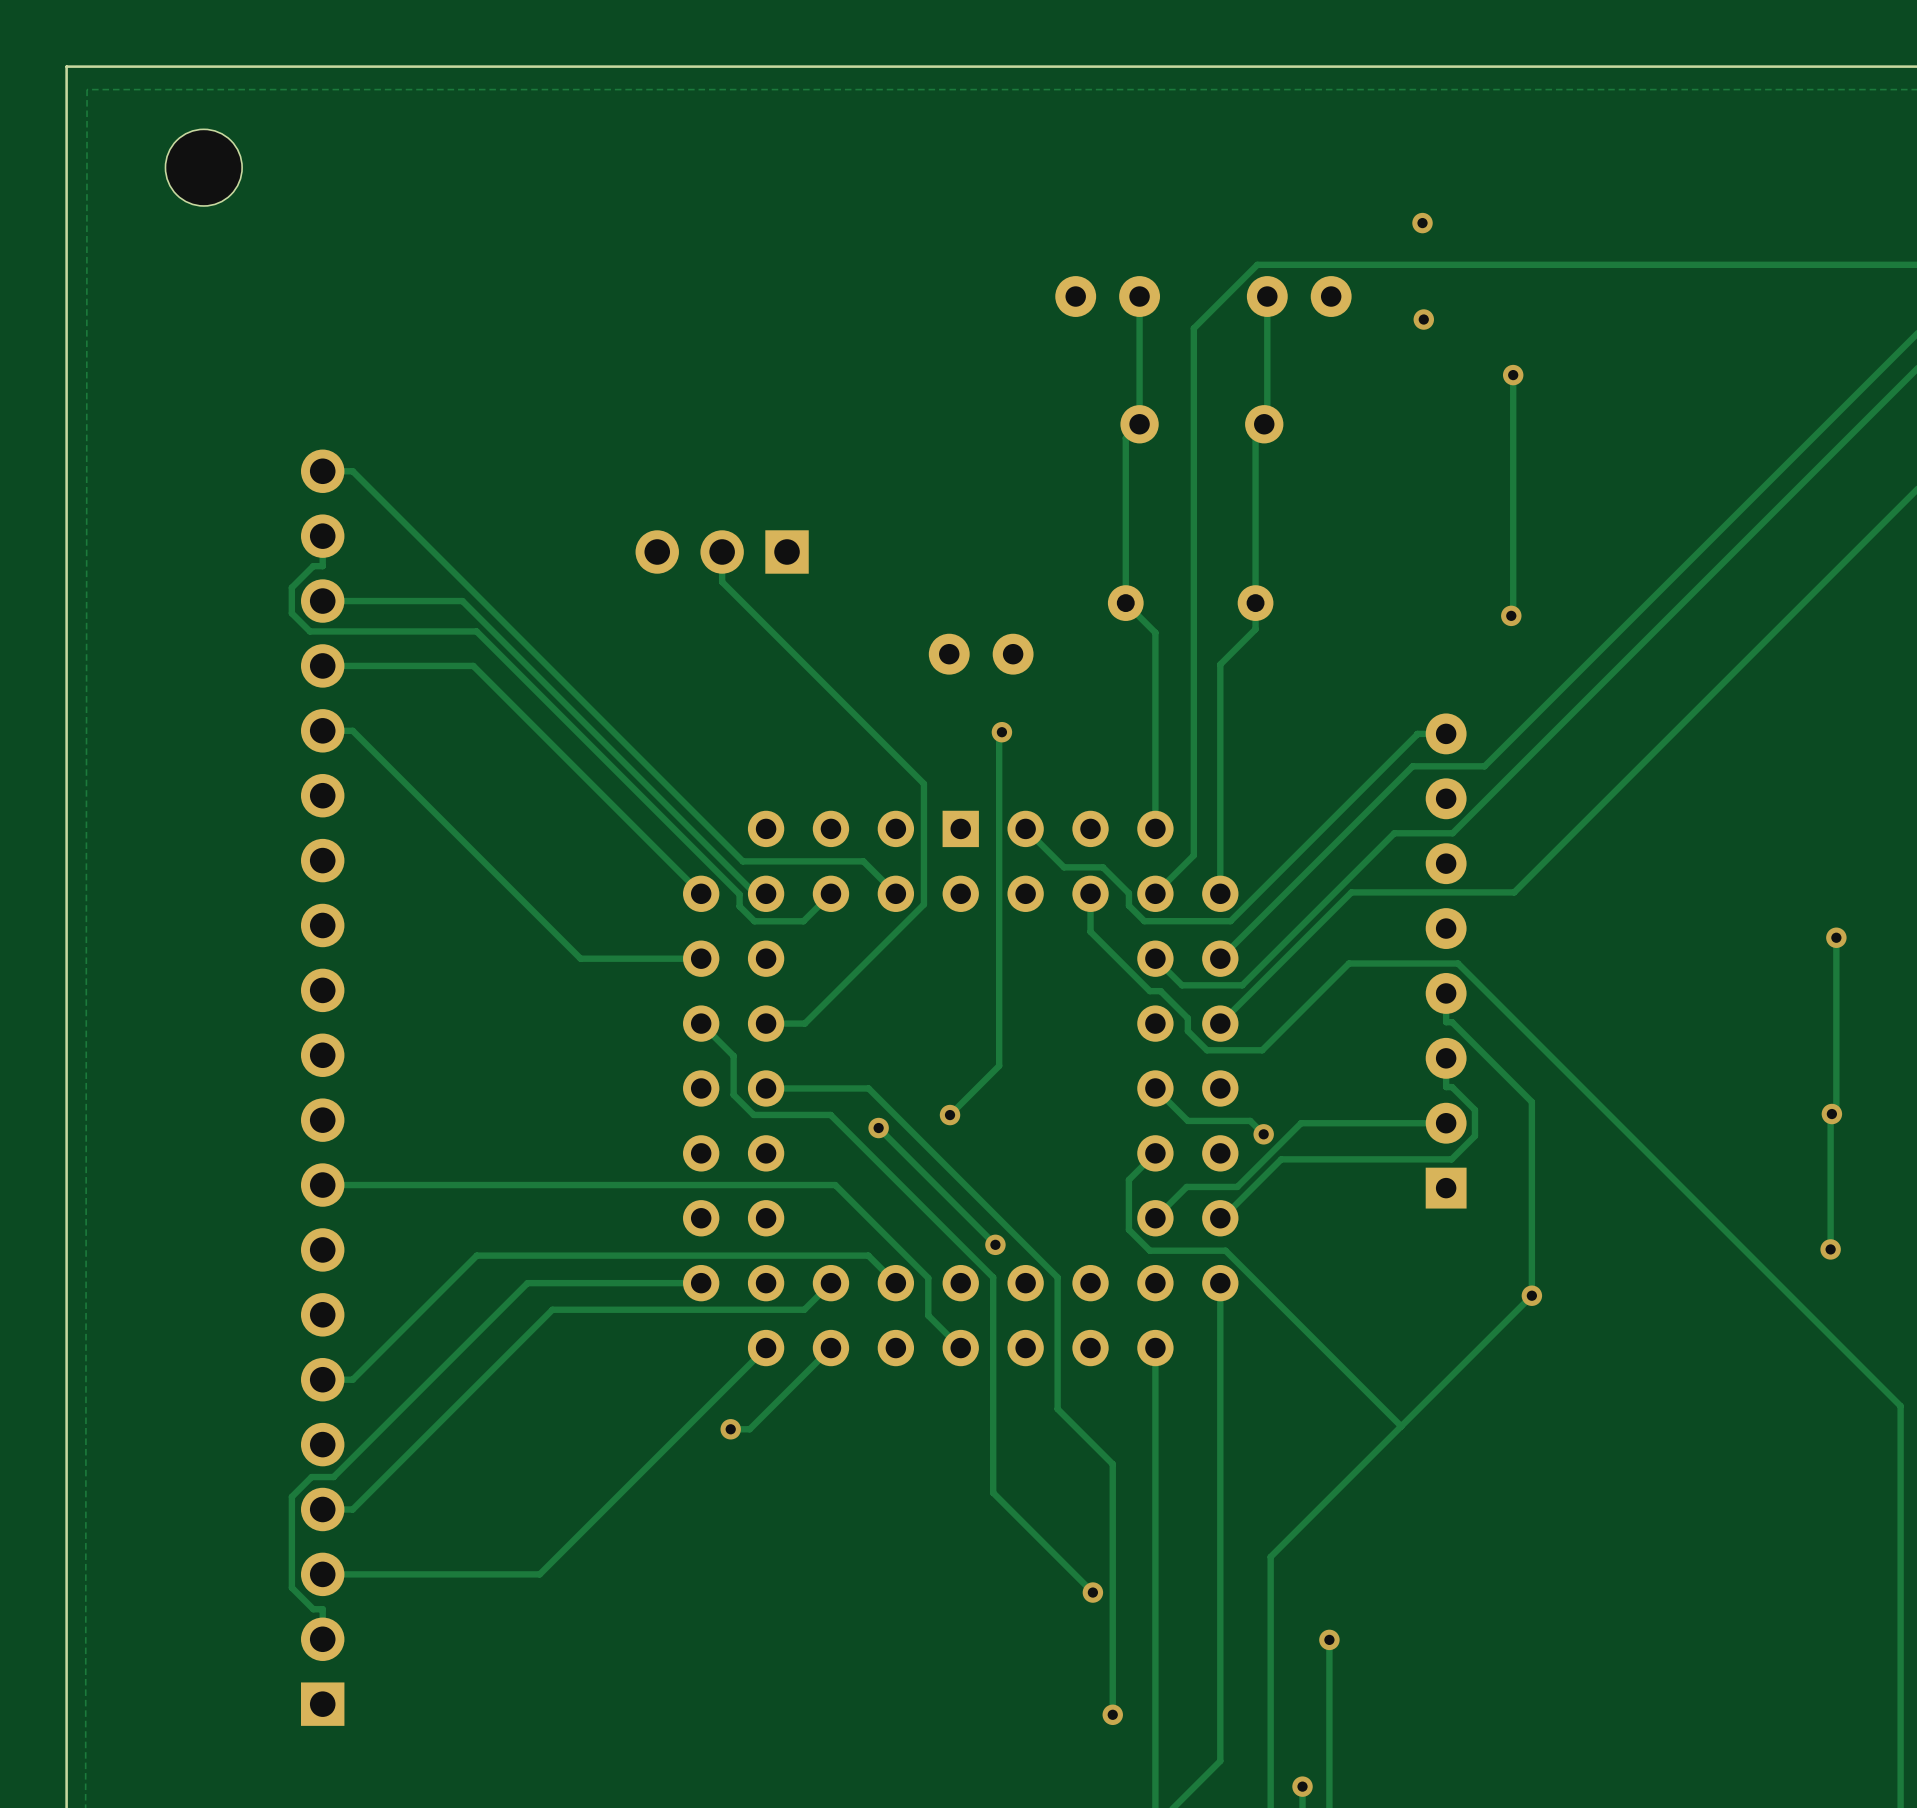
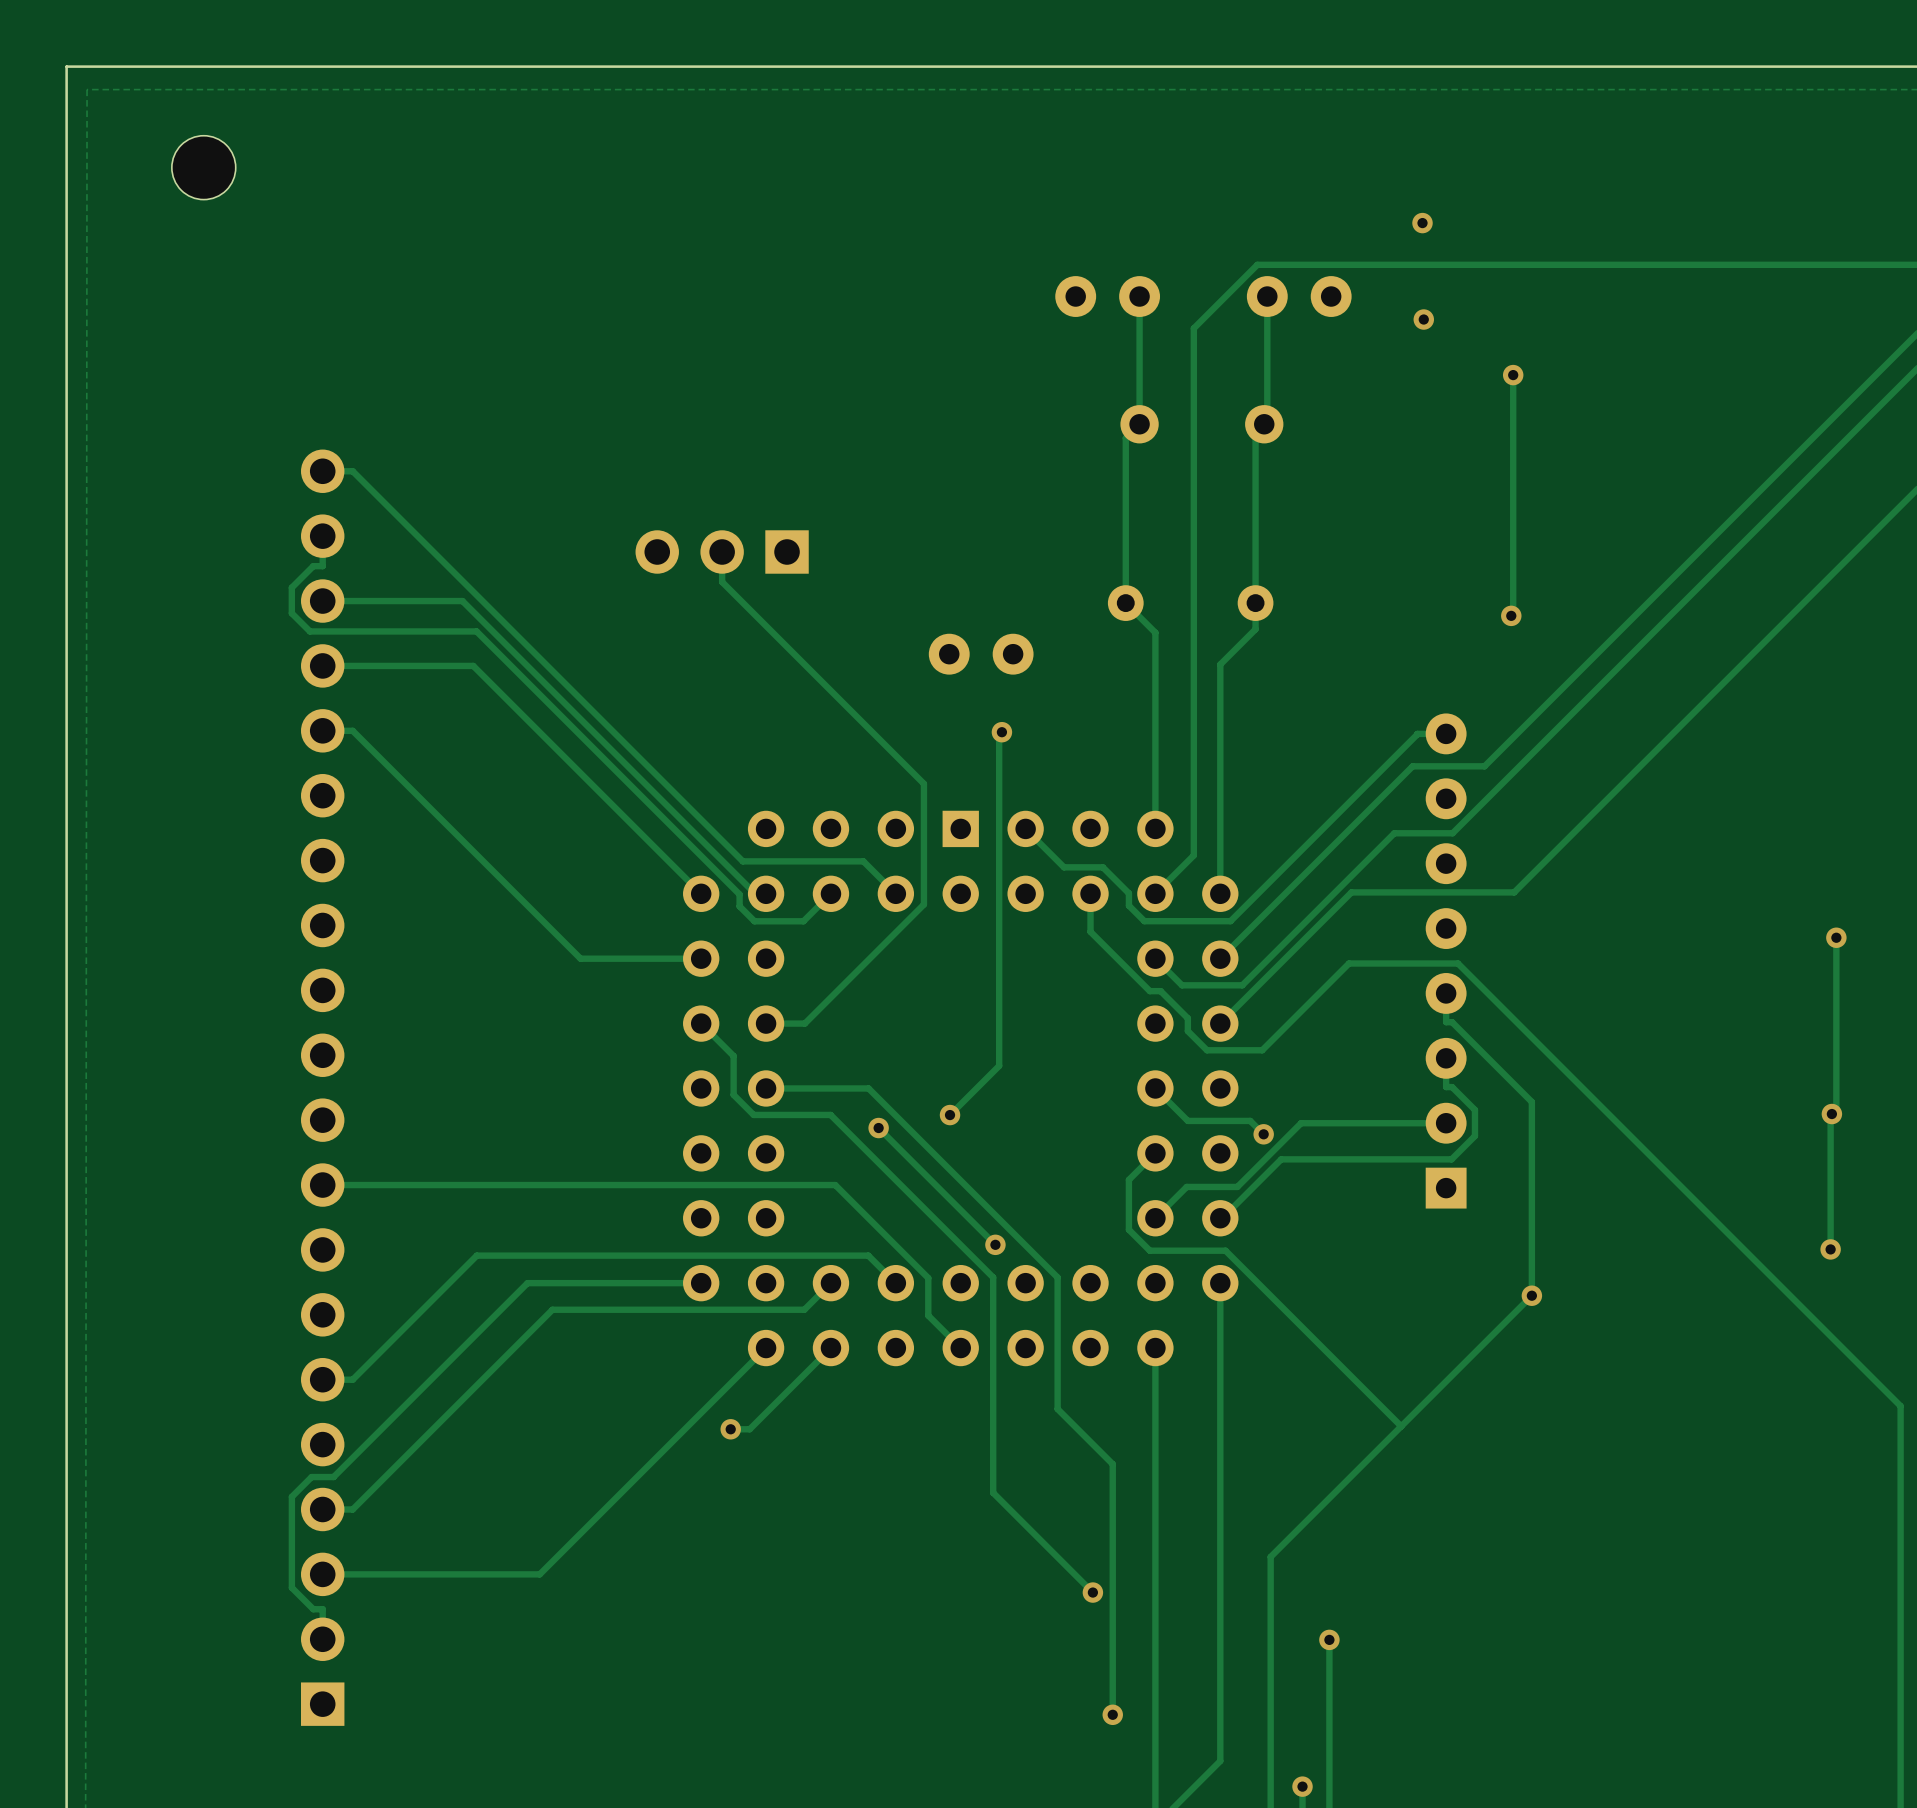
part footprint: [165, 129, 243, 206] -> [171, 135, 236, 200]

